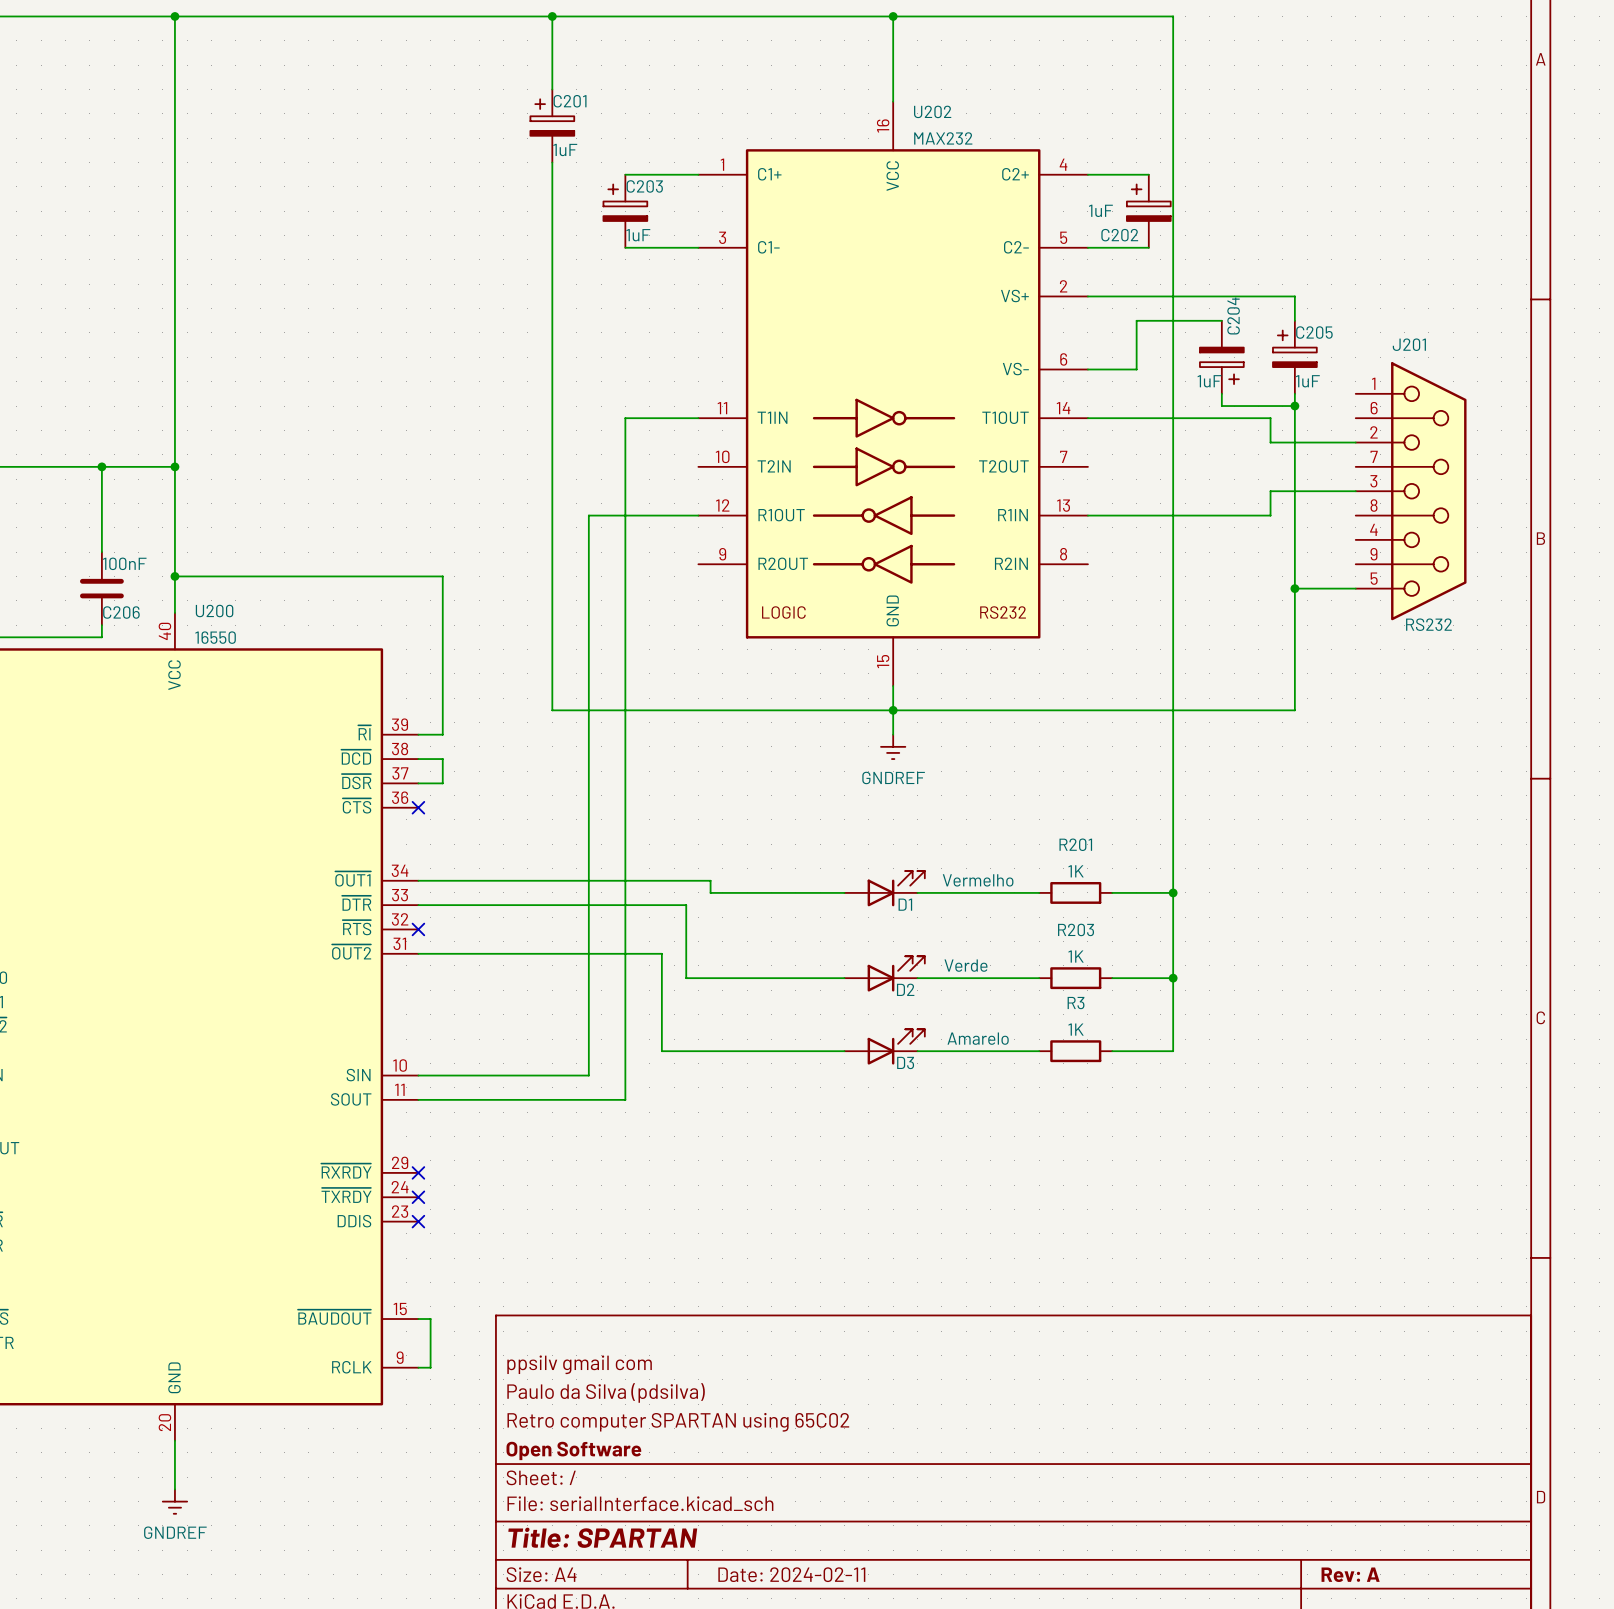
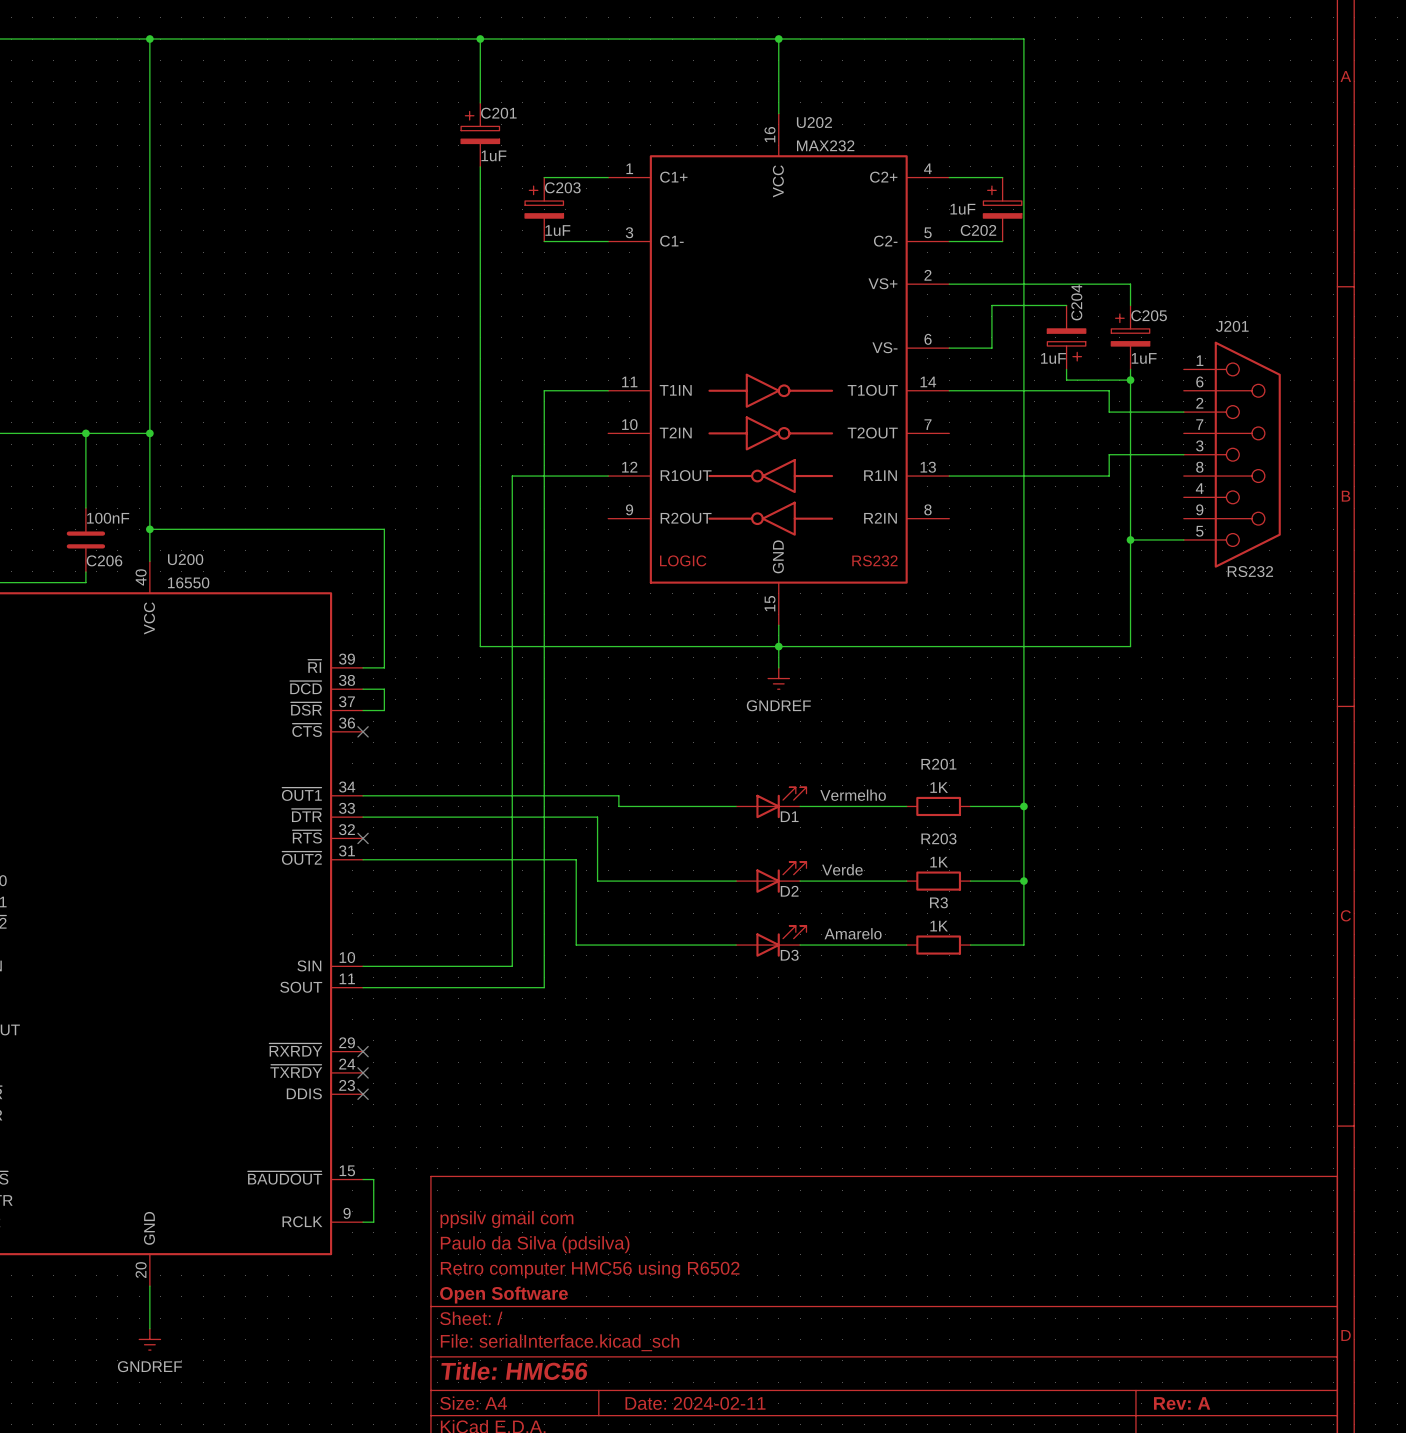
title block: Retro computer SPARTAN using 65C02 (678, 1422) -> Retro computer HMC56 using R6502 (590, 1269)
title block: Title: SPARTAN (602, 1537) -> Title: HMC56 (514, 1371)

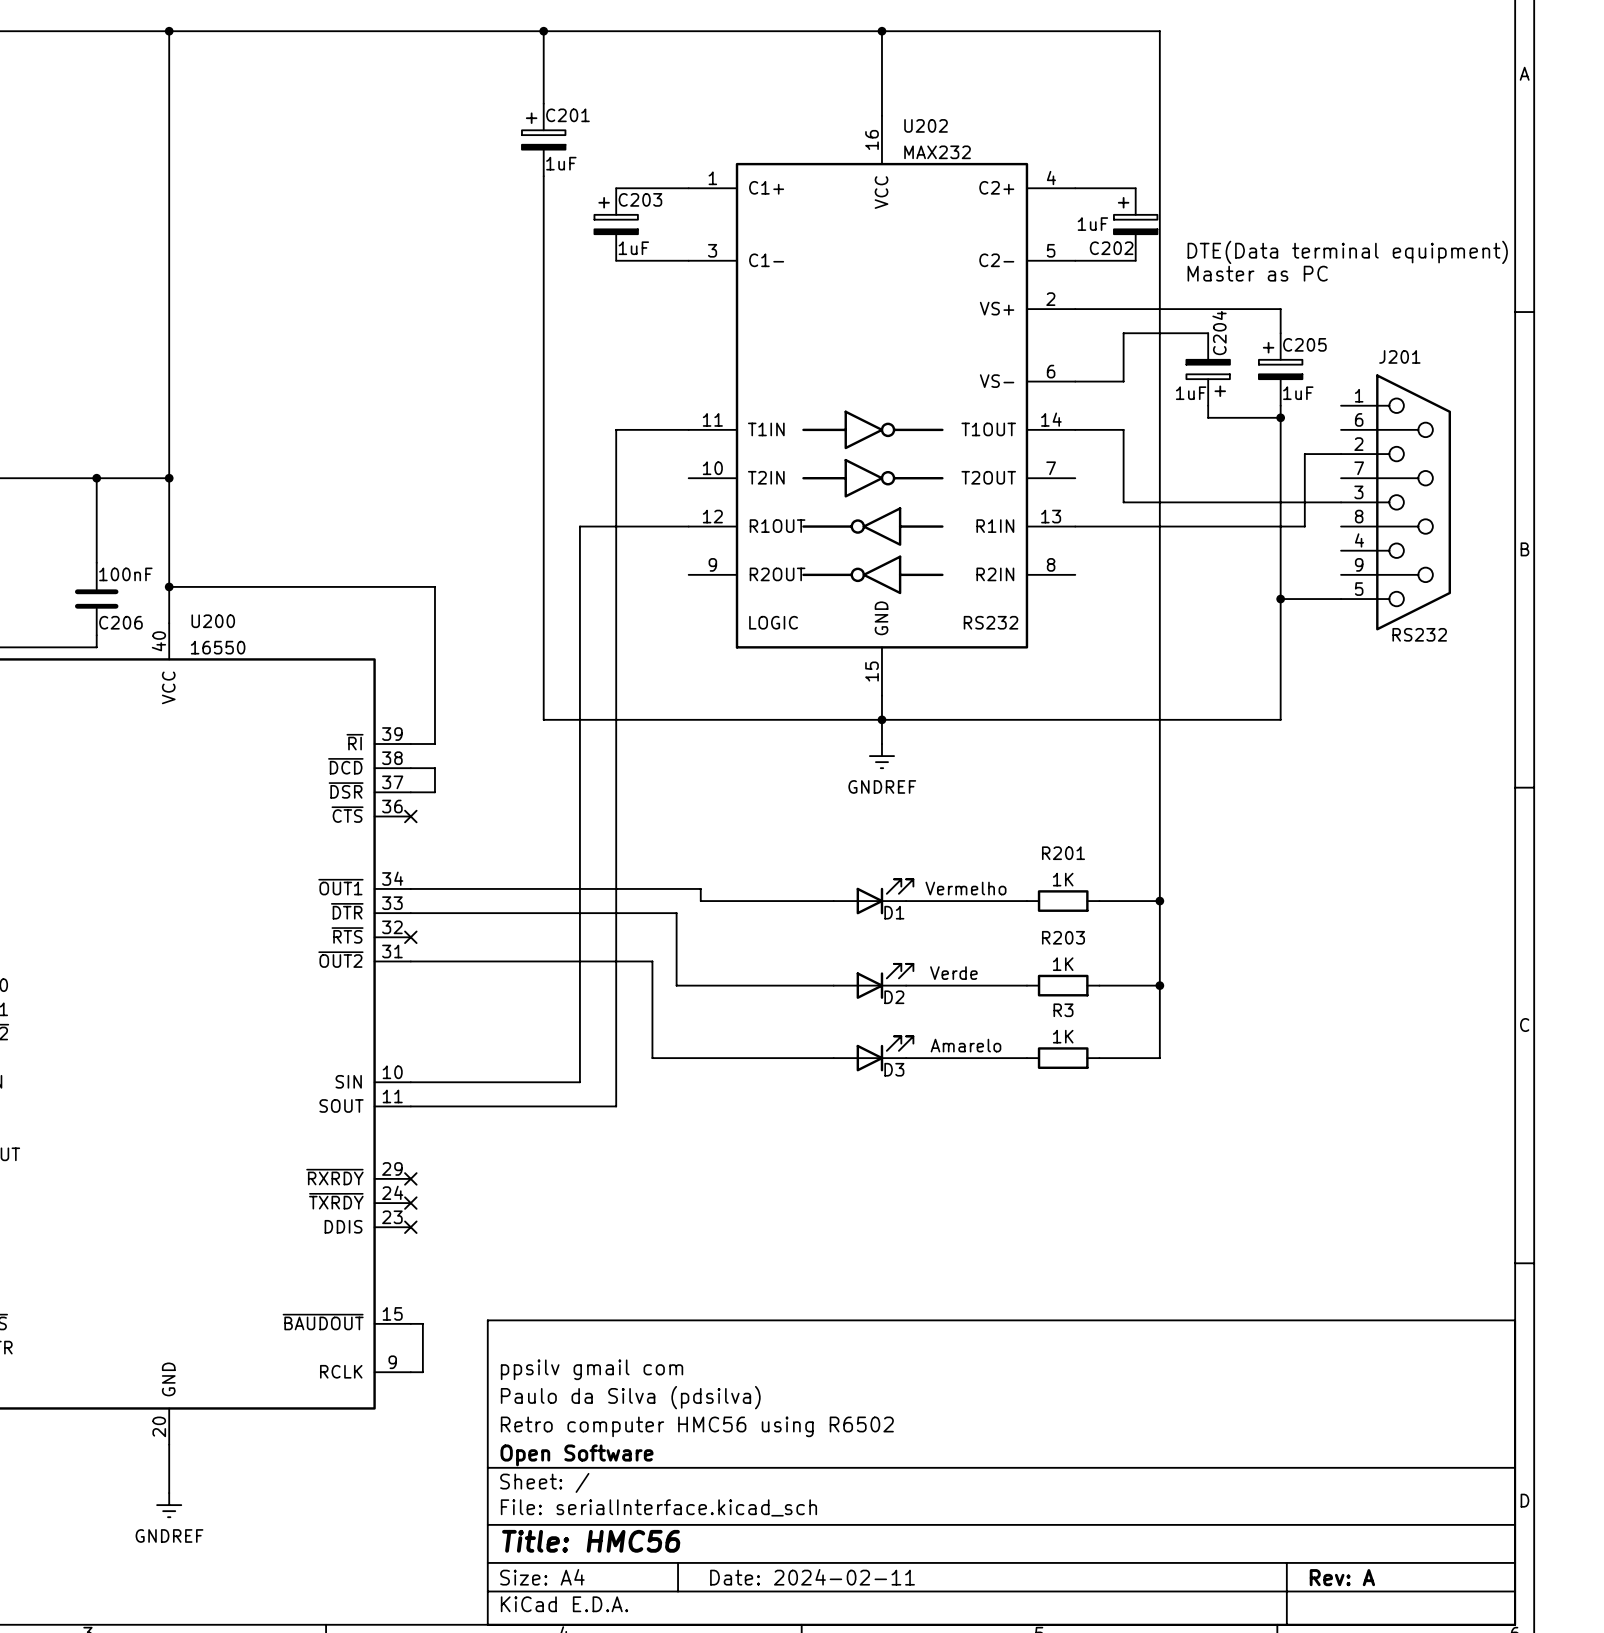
text: none -> DTE(Data terminal equipment) (1347, 252)
text: none -> Master as PC (1257, 273)
wire: (991, 390) (1109, 390) (1109, 412) (1151, 412) -> (1123, 429) (1123, 502) (1256, 502)
wire: (1109, 454) (1109, 476) -> (1304, 454) (1304, 526) (1256, 526)

